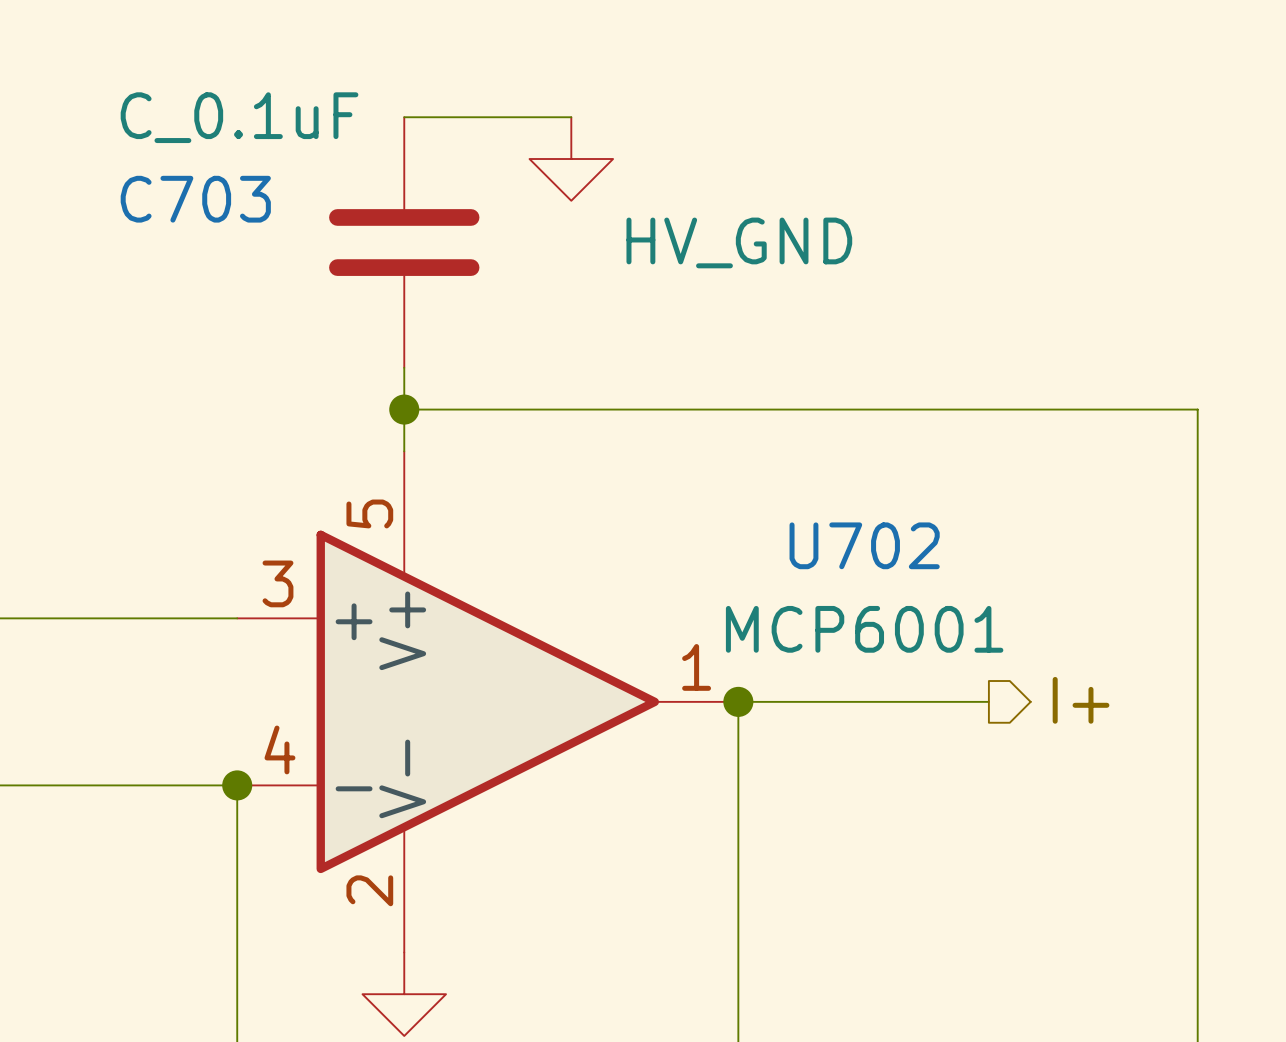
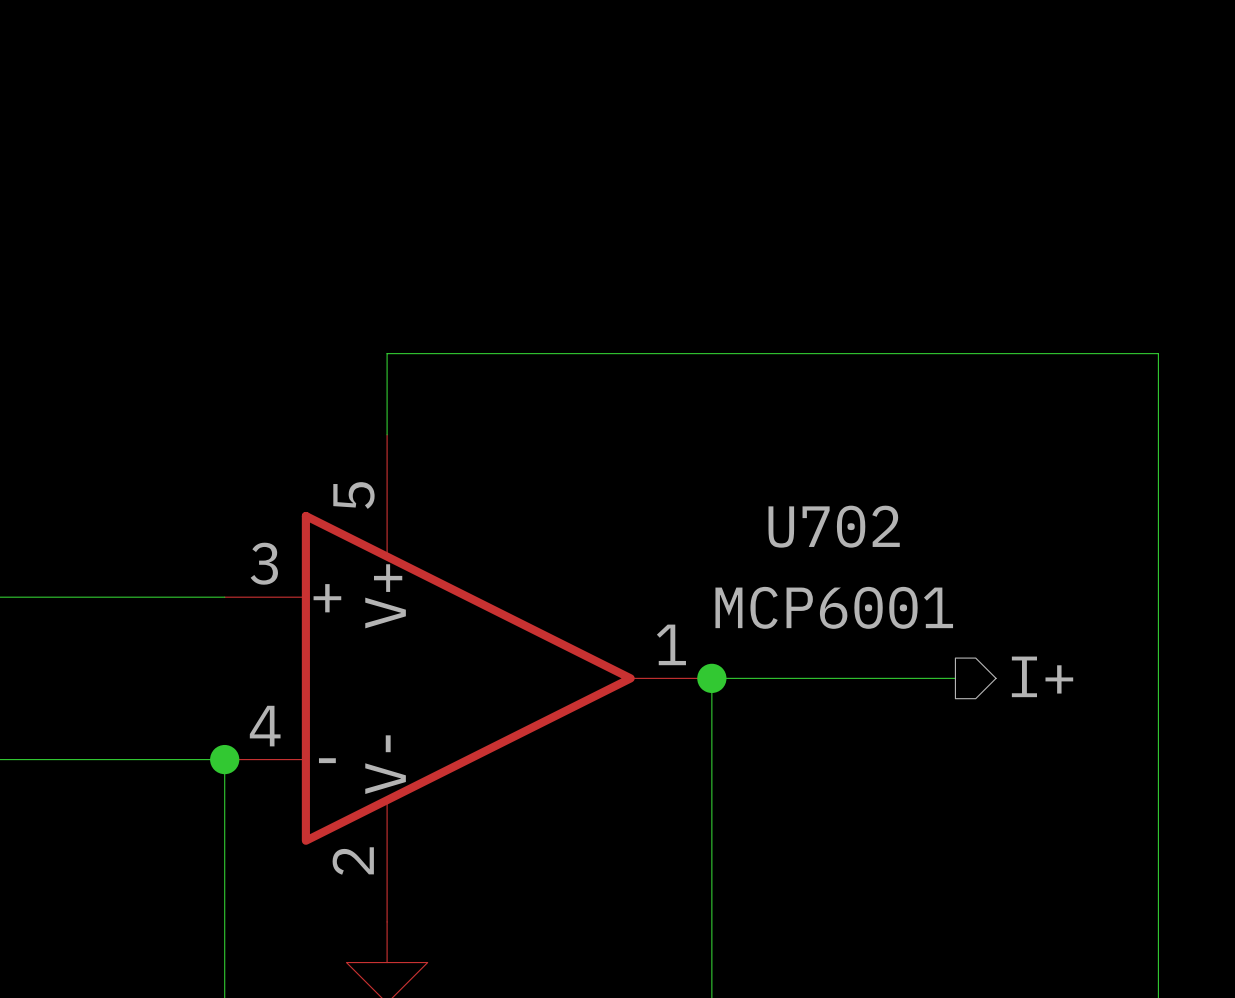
wire: (404, 117) (571, 117) -> none
power symbol: HV_GND (571, 159) -> none
C703: C_0.1uF (404, 242) -> none
wire: (404, 409) (1197, 409) -> (387, 353) (1158, 353) (1158, 394)
junction: (404, 409) -> none

